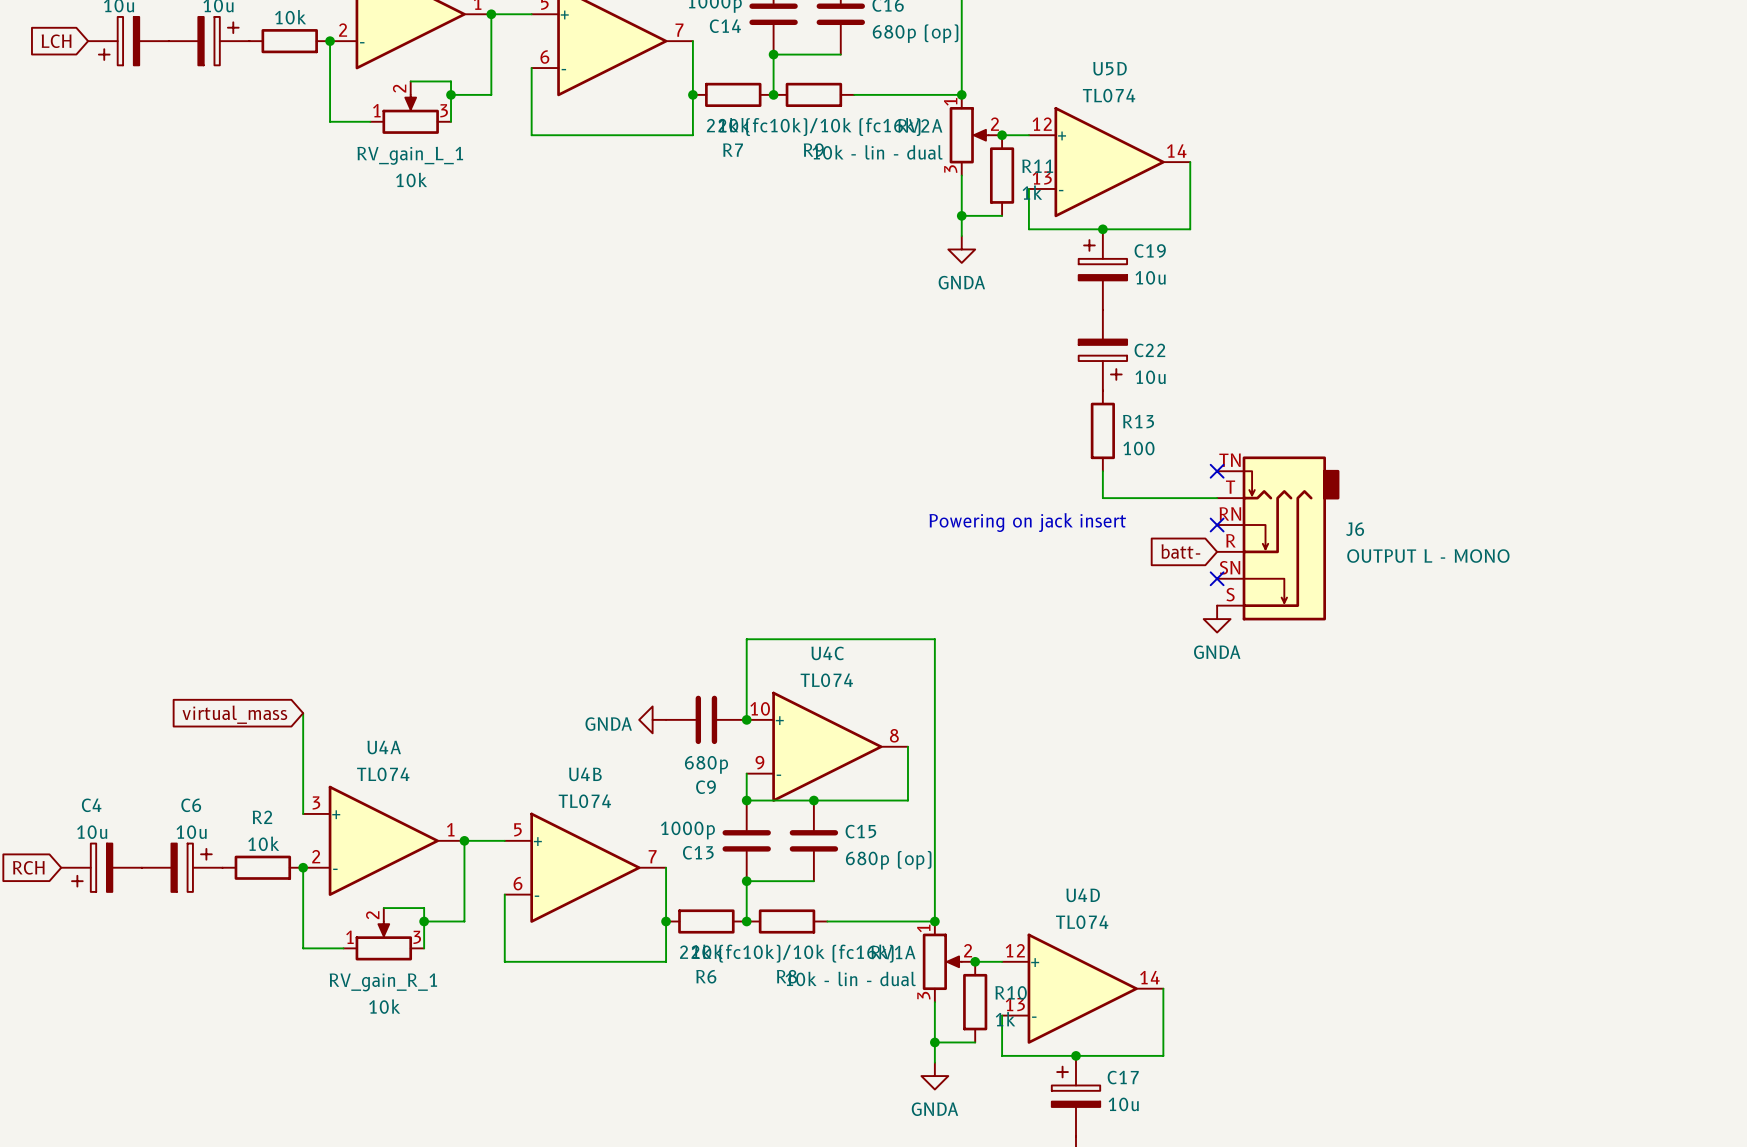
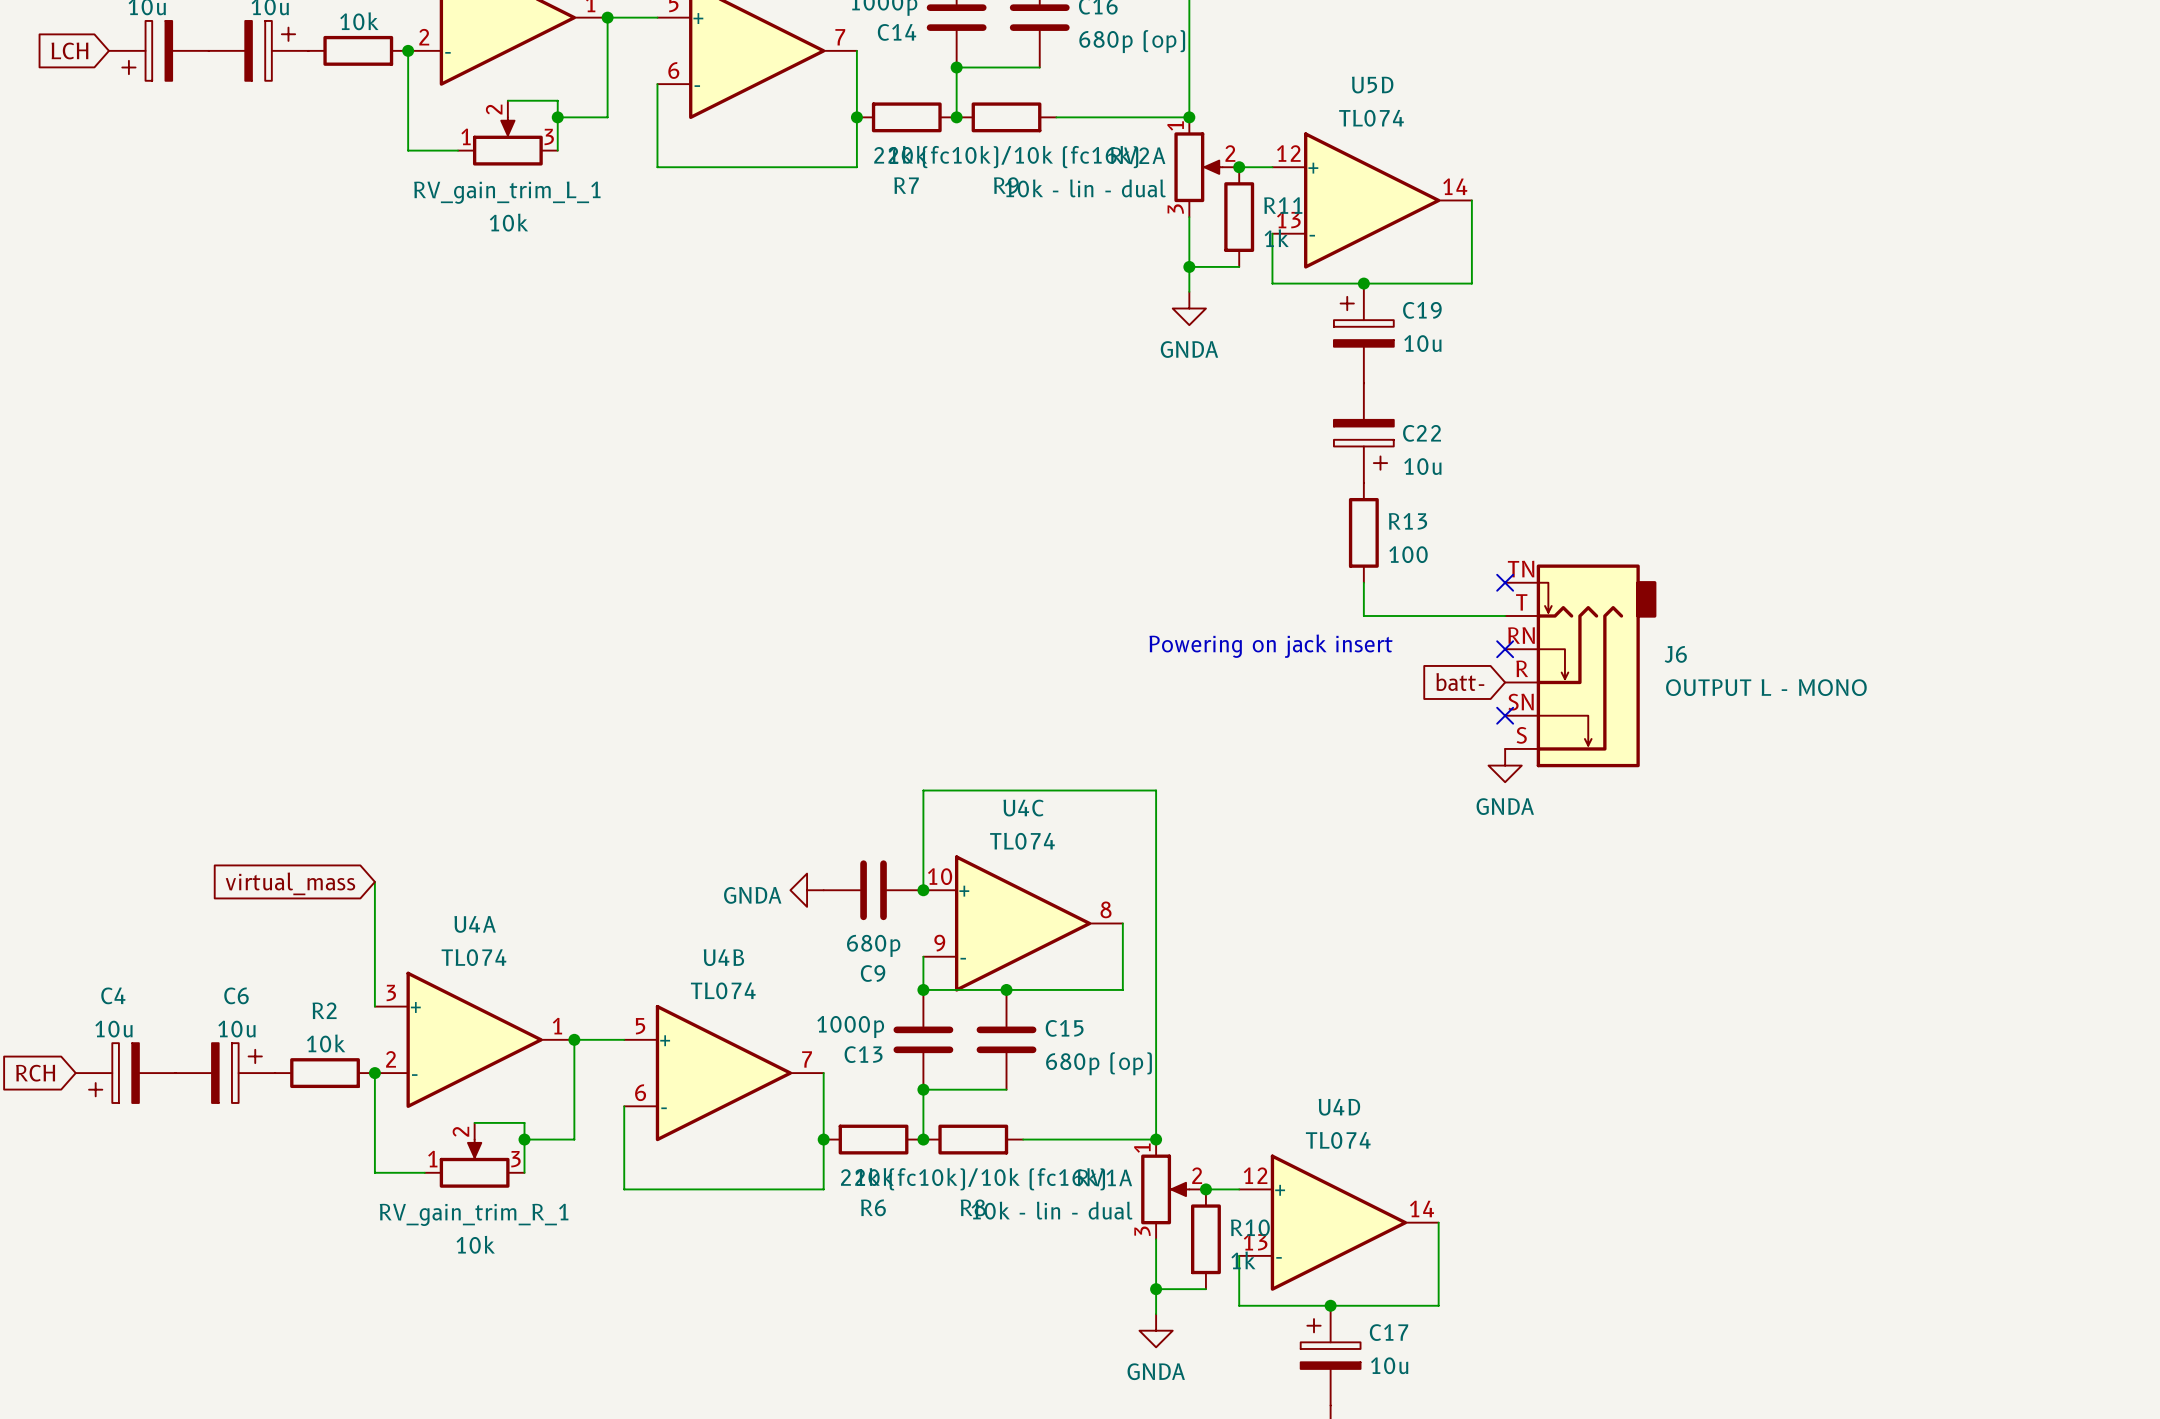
RV_gain_L_1 name: RV_gain_L_1 (410, 155) -> RV_gain_trim_L_1 (507, 192)
RV_gain_R_1 name: RV_gain_R_1 (383, 982) -> RV_gain_trim_R_1 (474, 1214)

